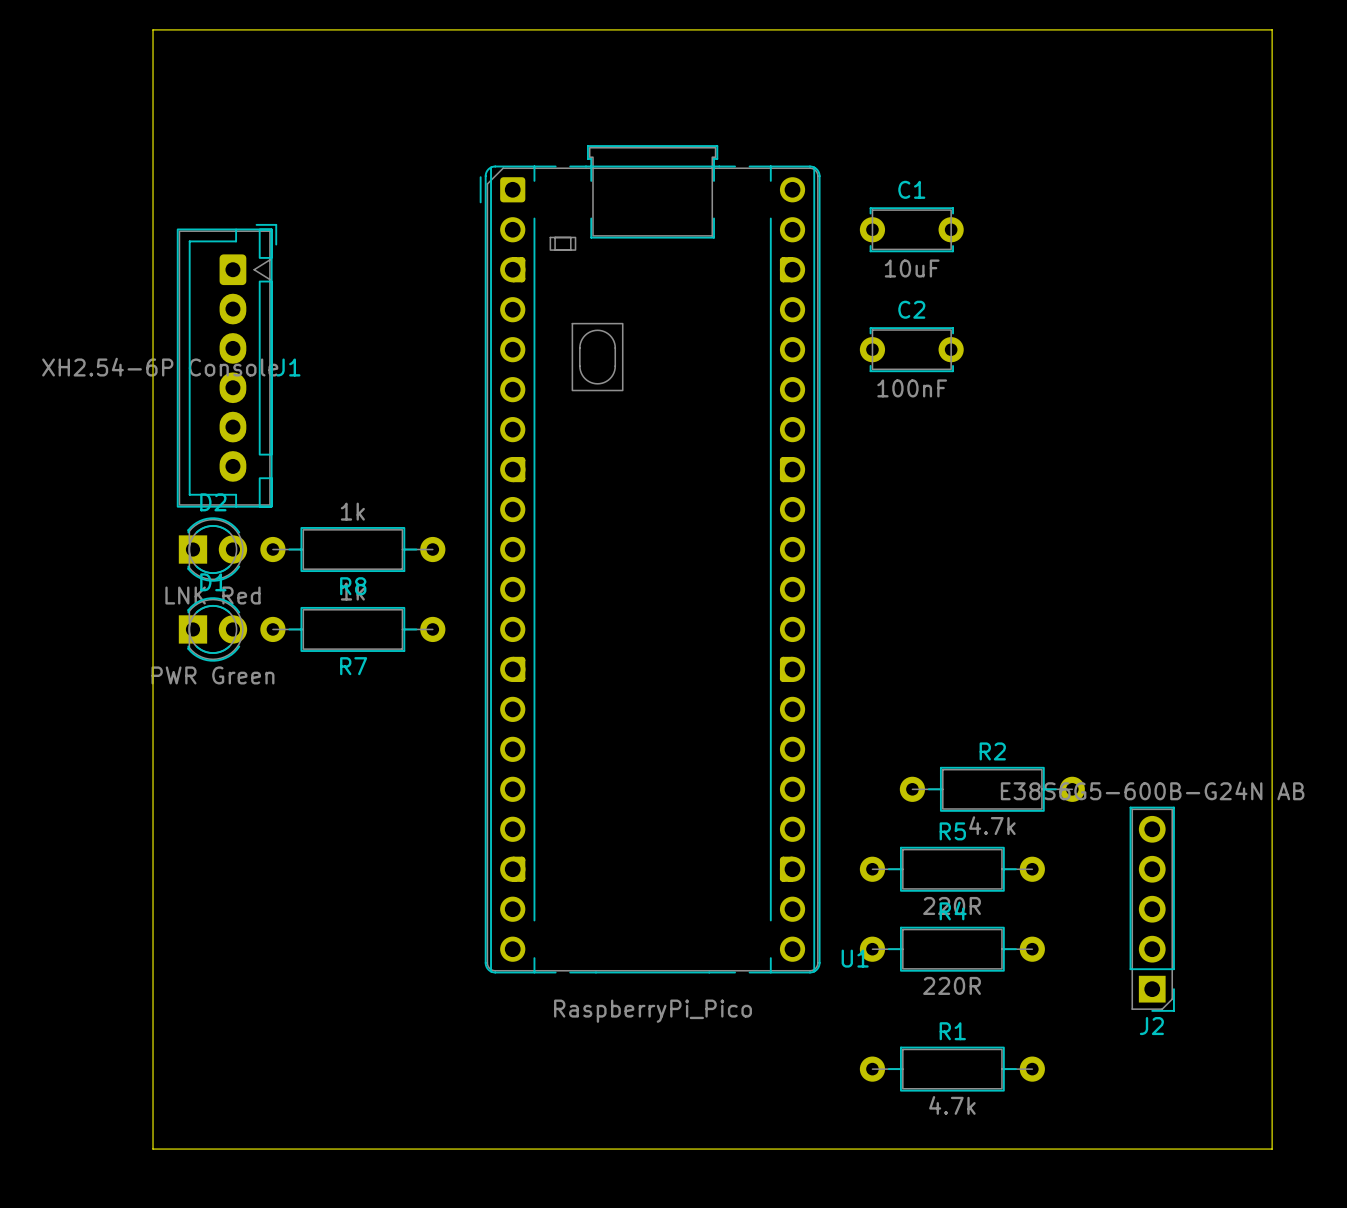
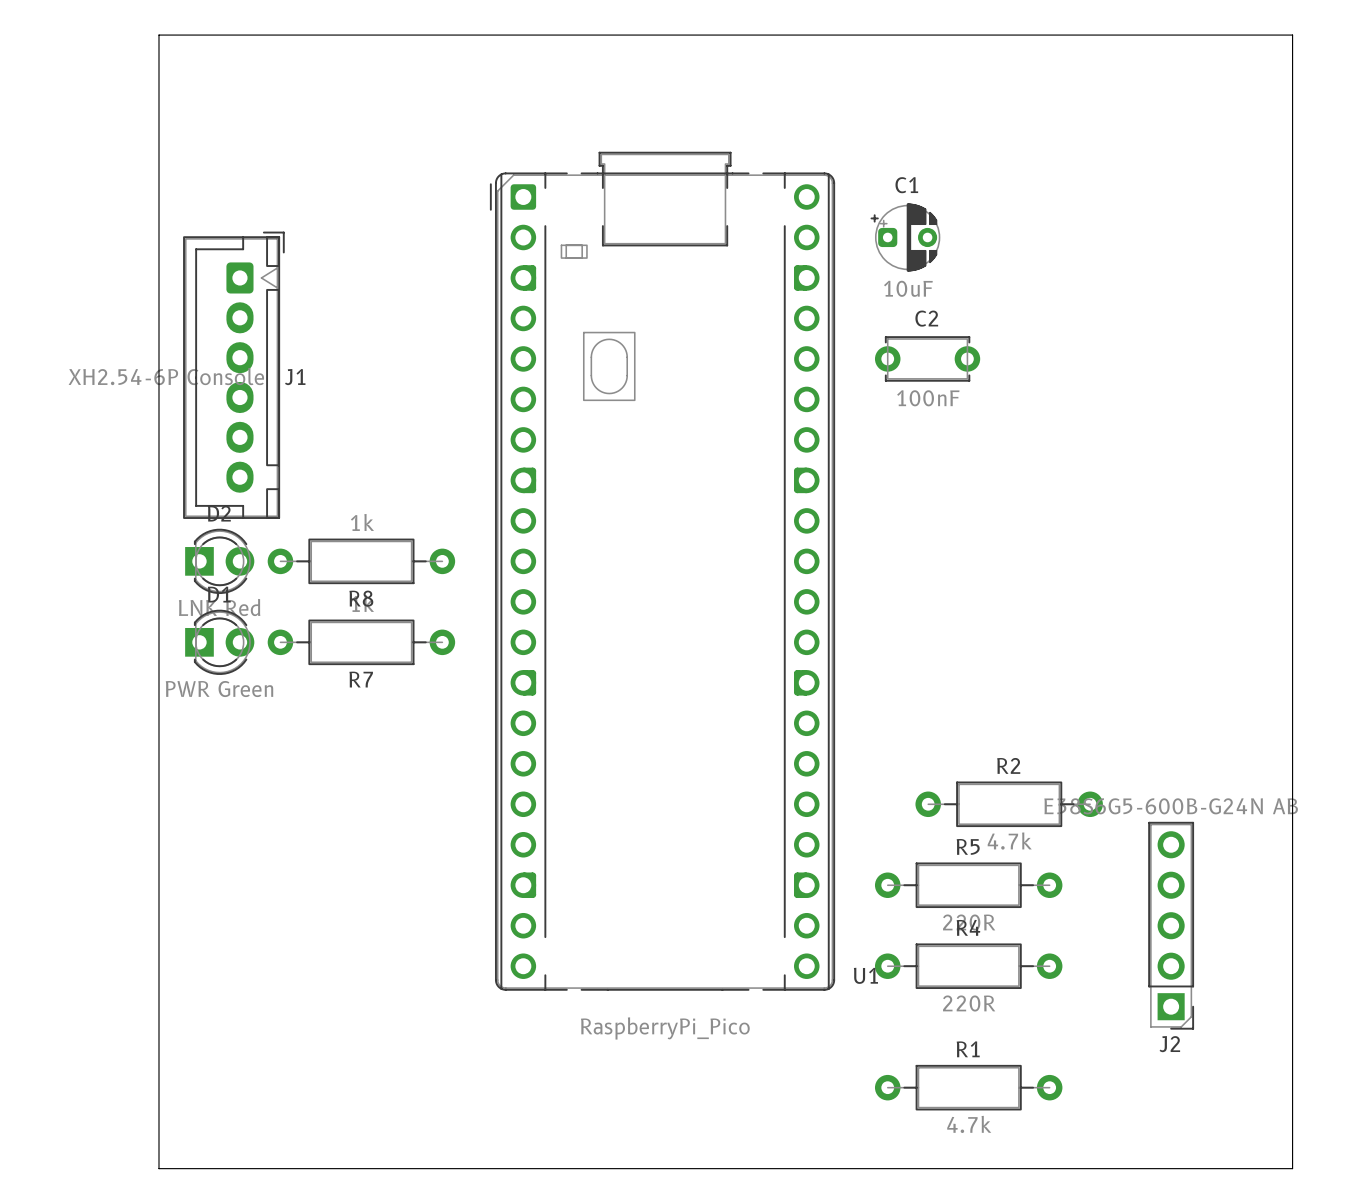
C1 footprint: [859, 207, 964, 253] -> [870, 203, 941, 272]

